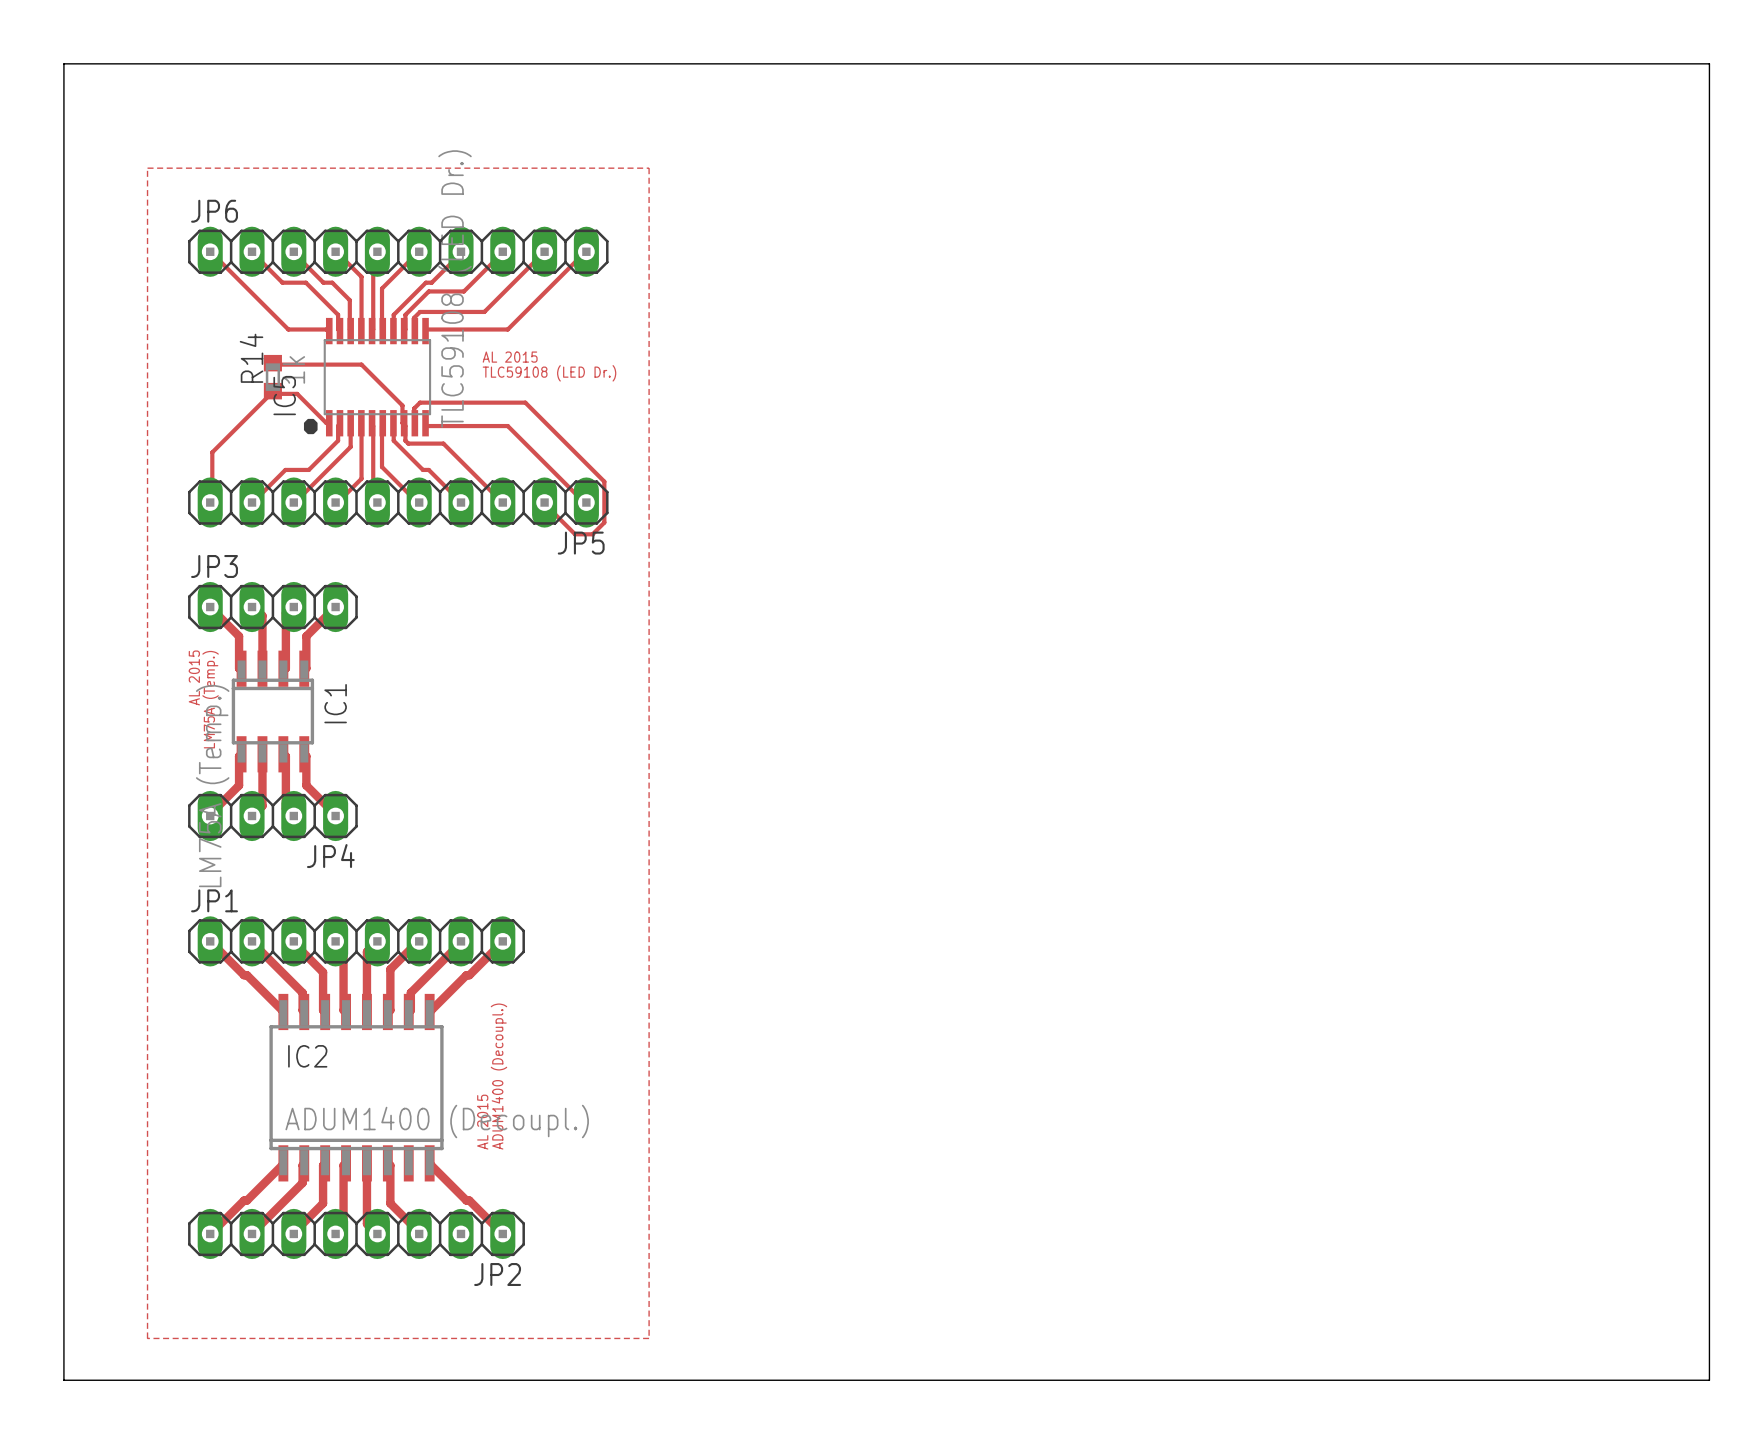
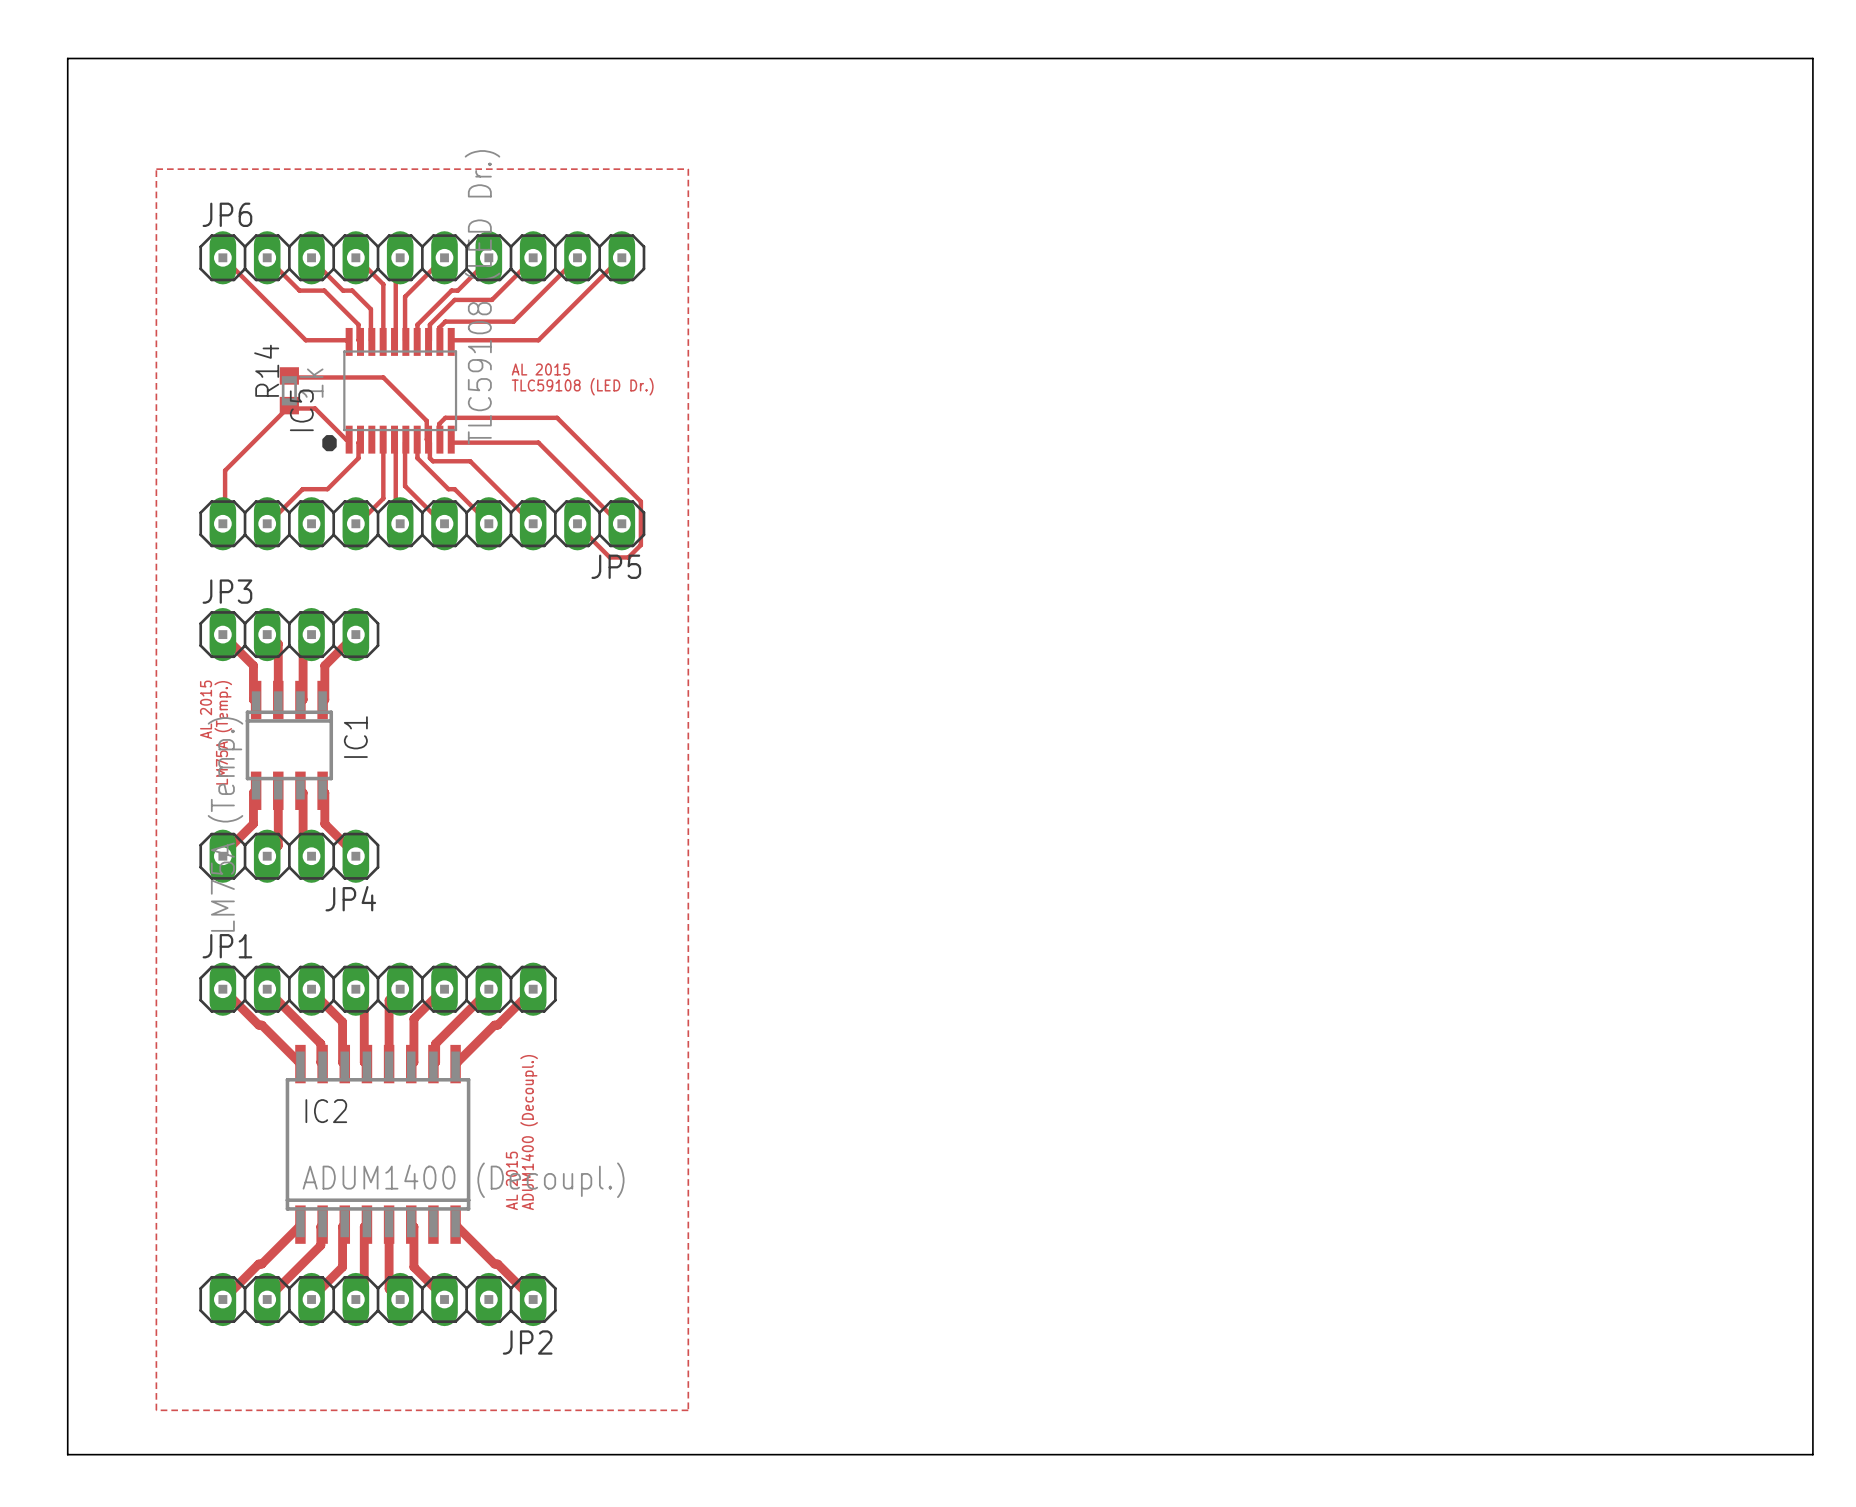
top track: (350, 423) (350, 446) (293, 502) -> none

